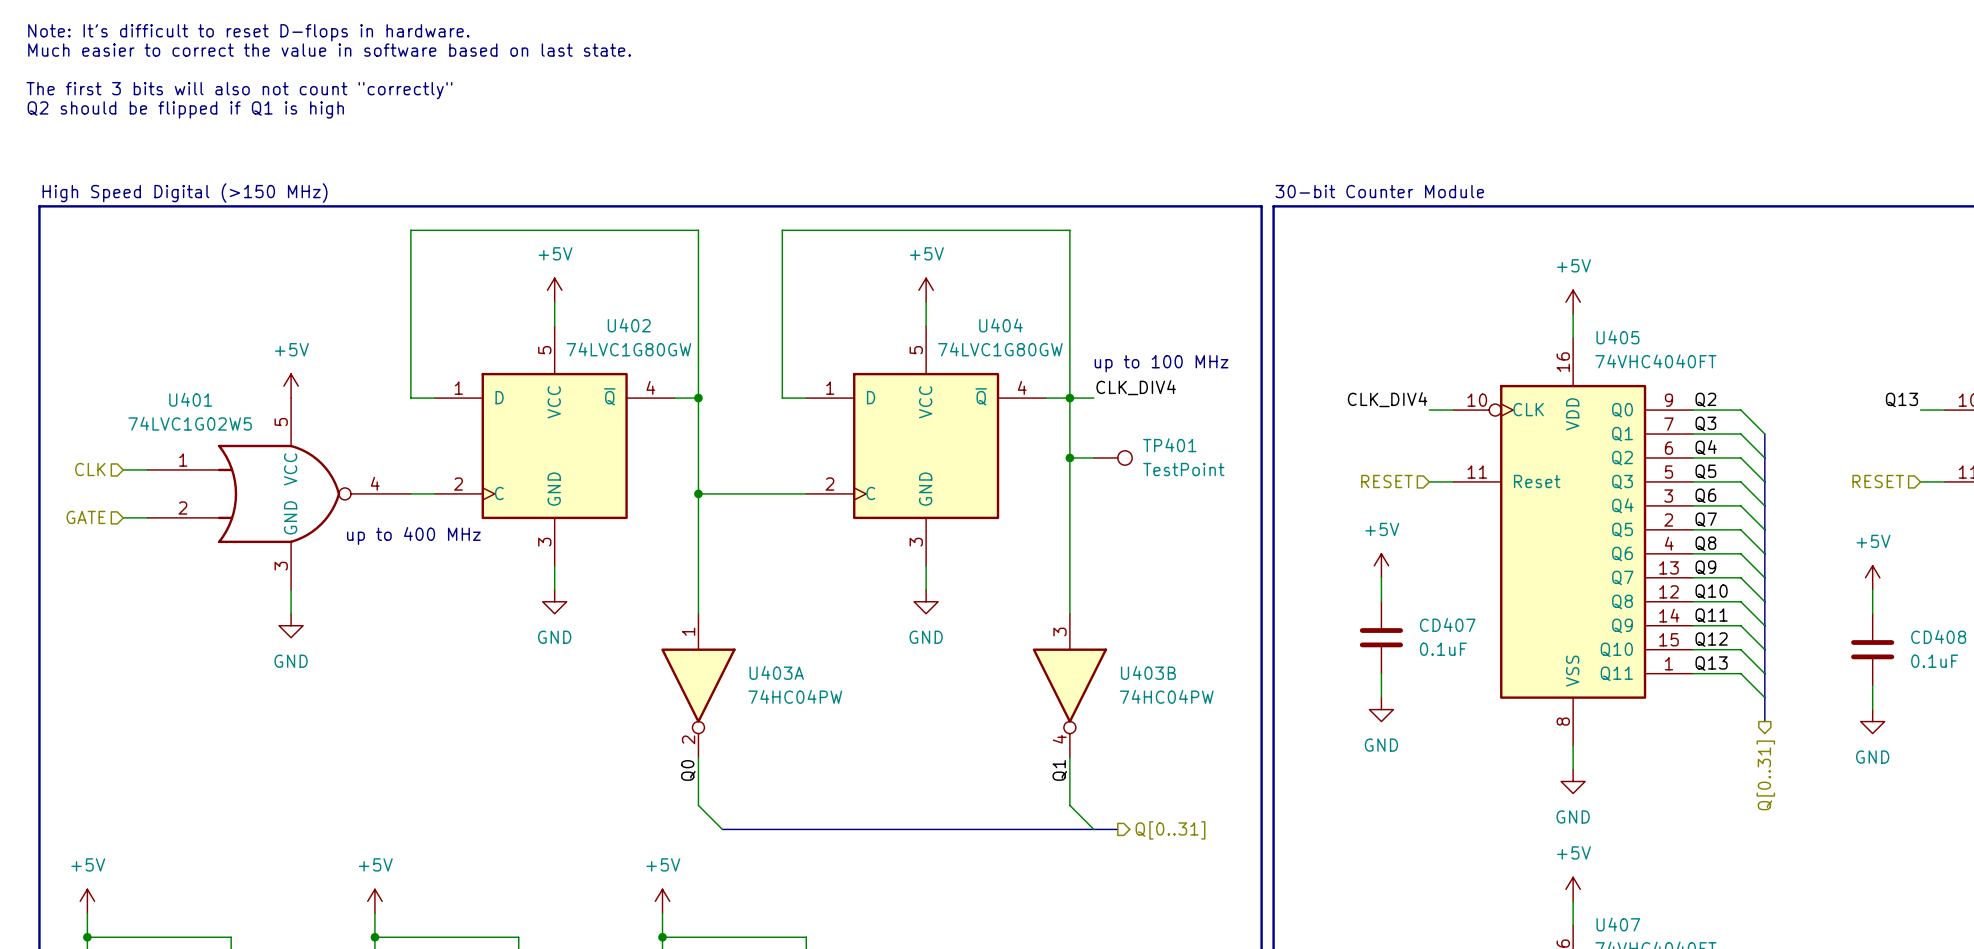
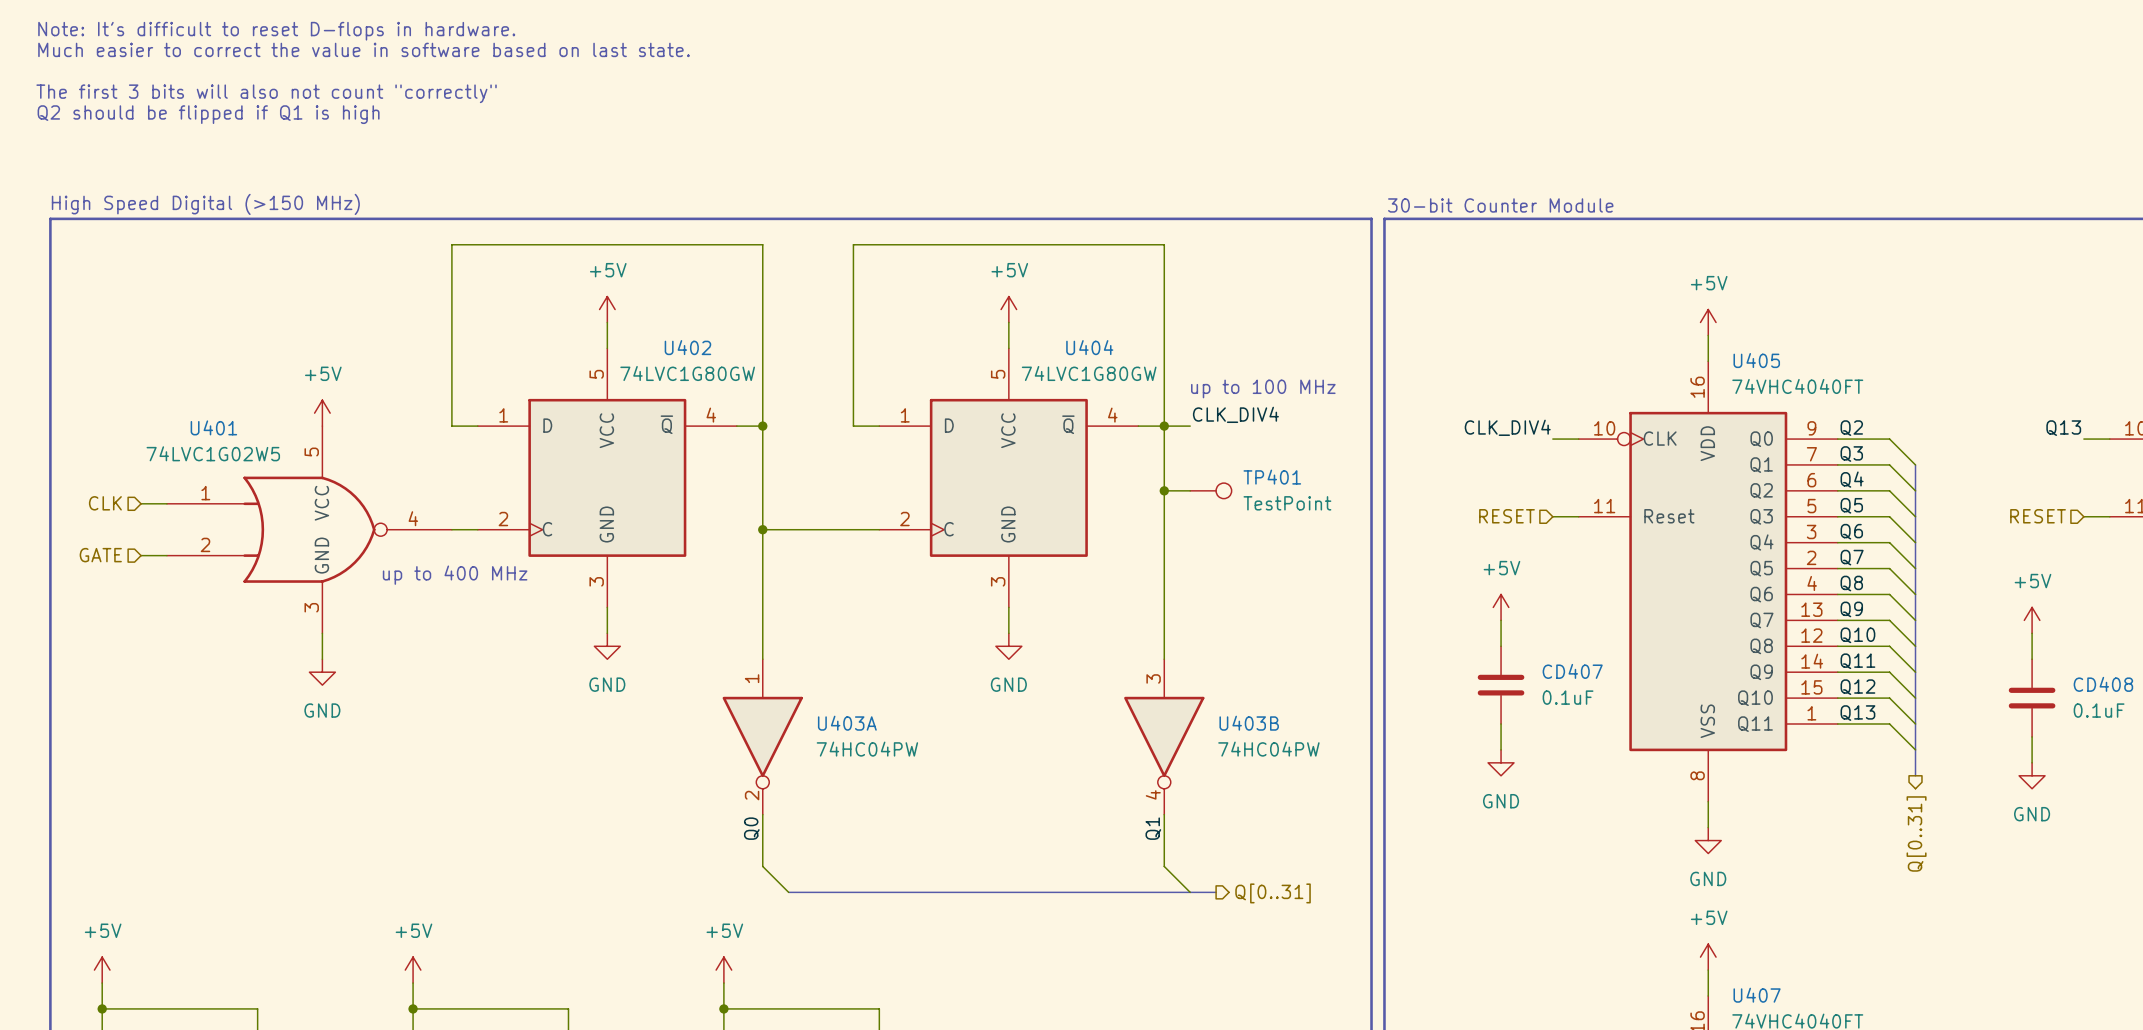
text position: 30-bit Counter Module (1379, 191) -> 30-bit Counter Module (1500, 205)
text position: High Speed Digital (>150 MHz) (185, 193) -> High Speed Digital (>150 MHz) (205, 204)

